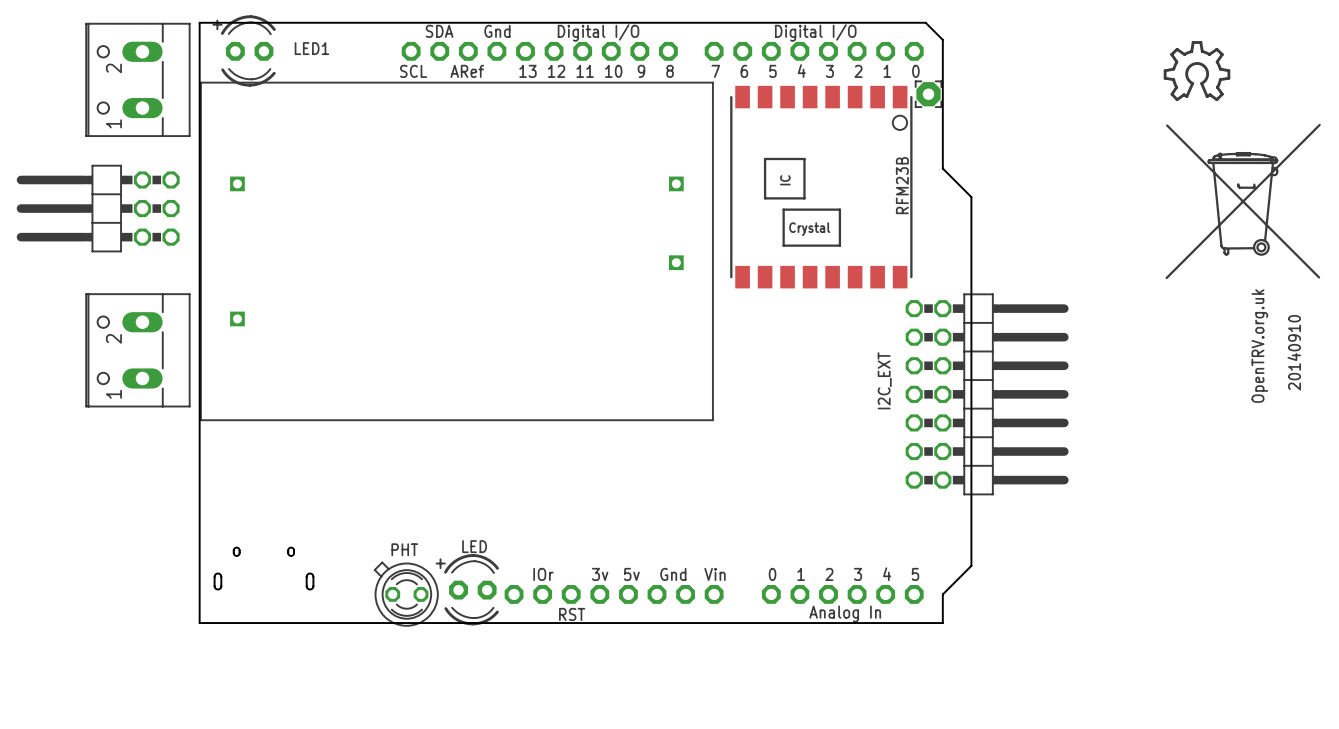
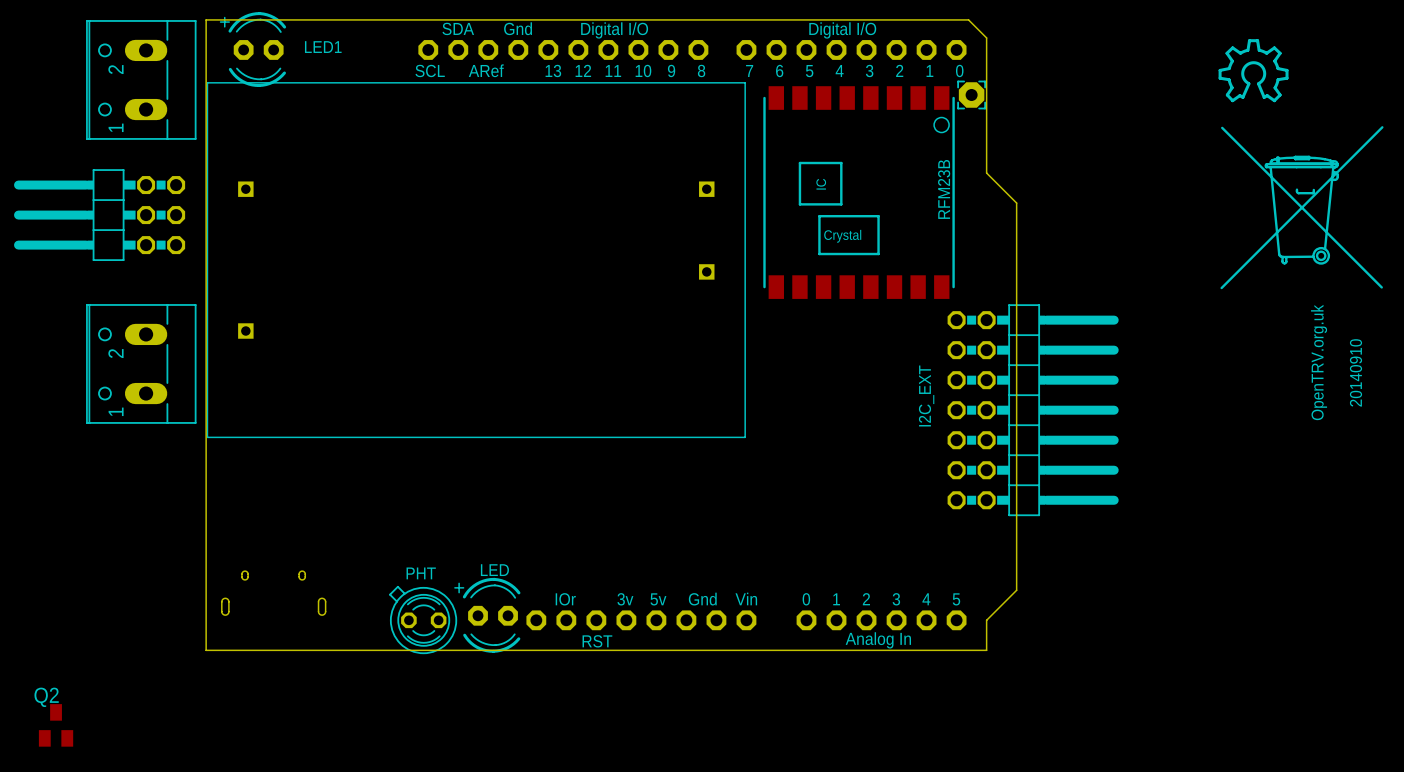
Q2: none -> (56, 725)

